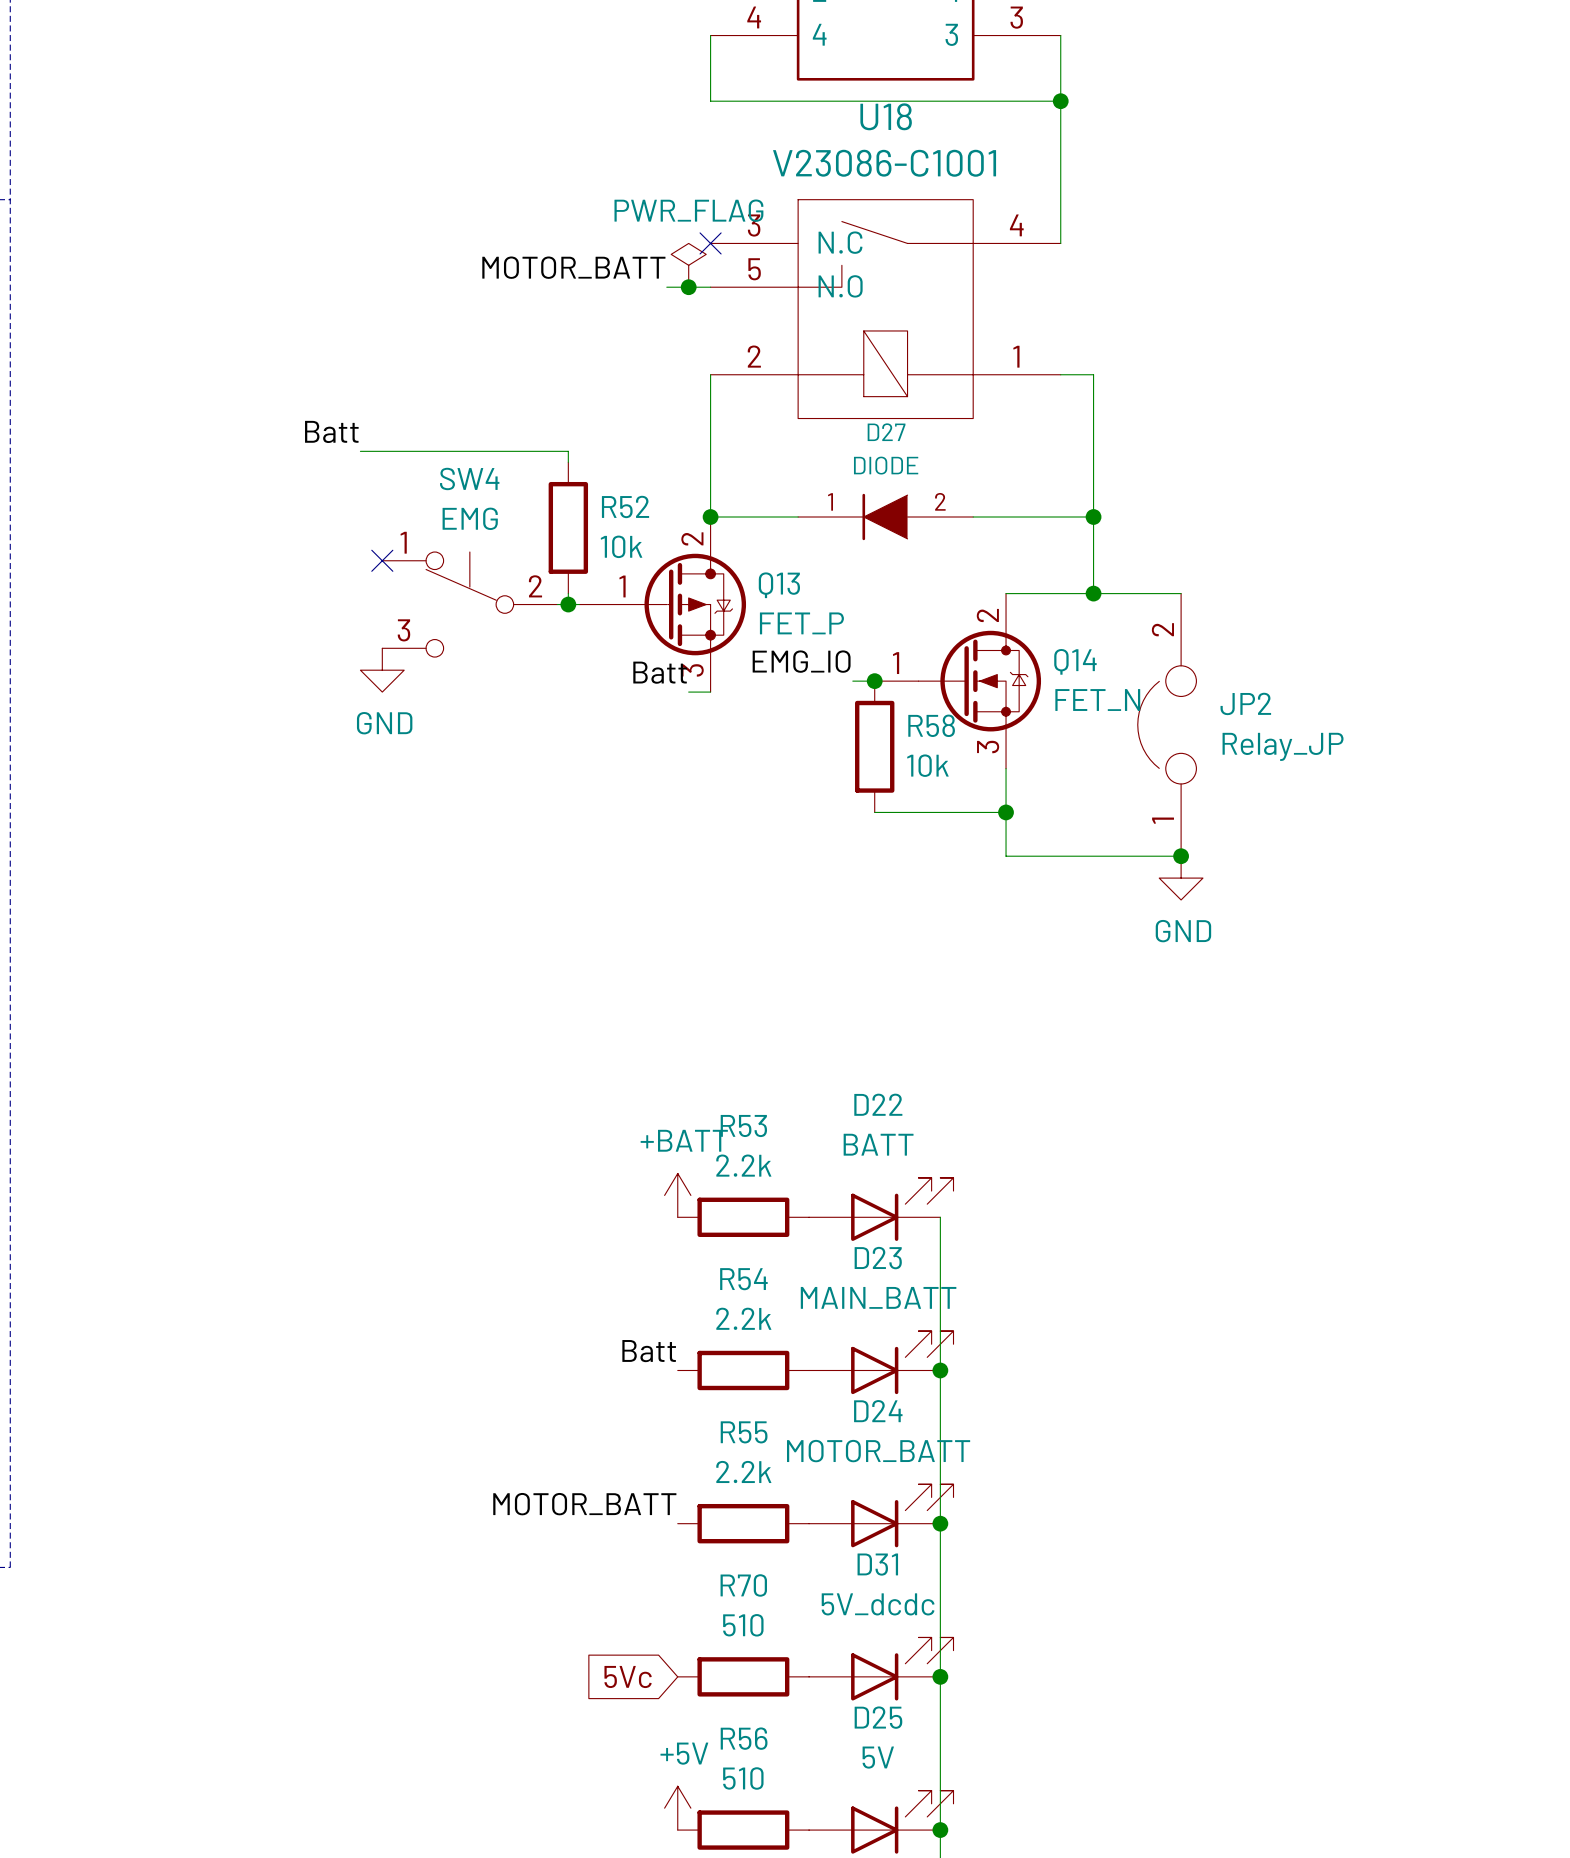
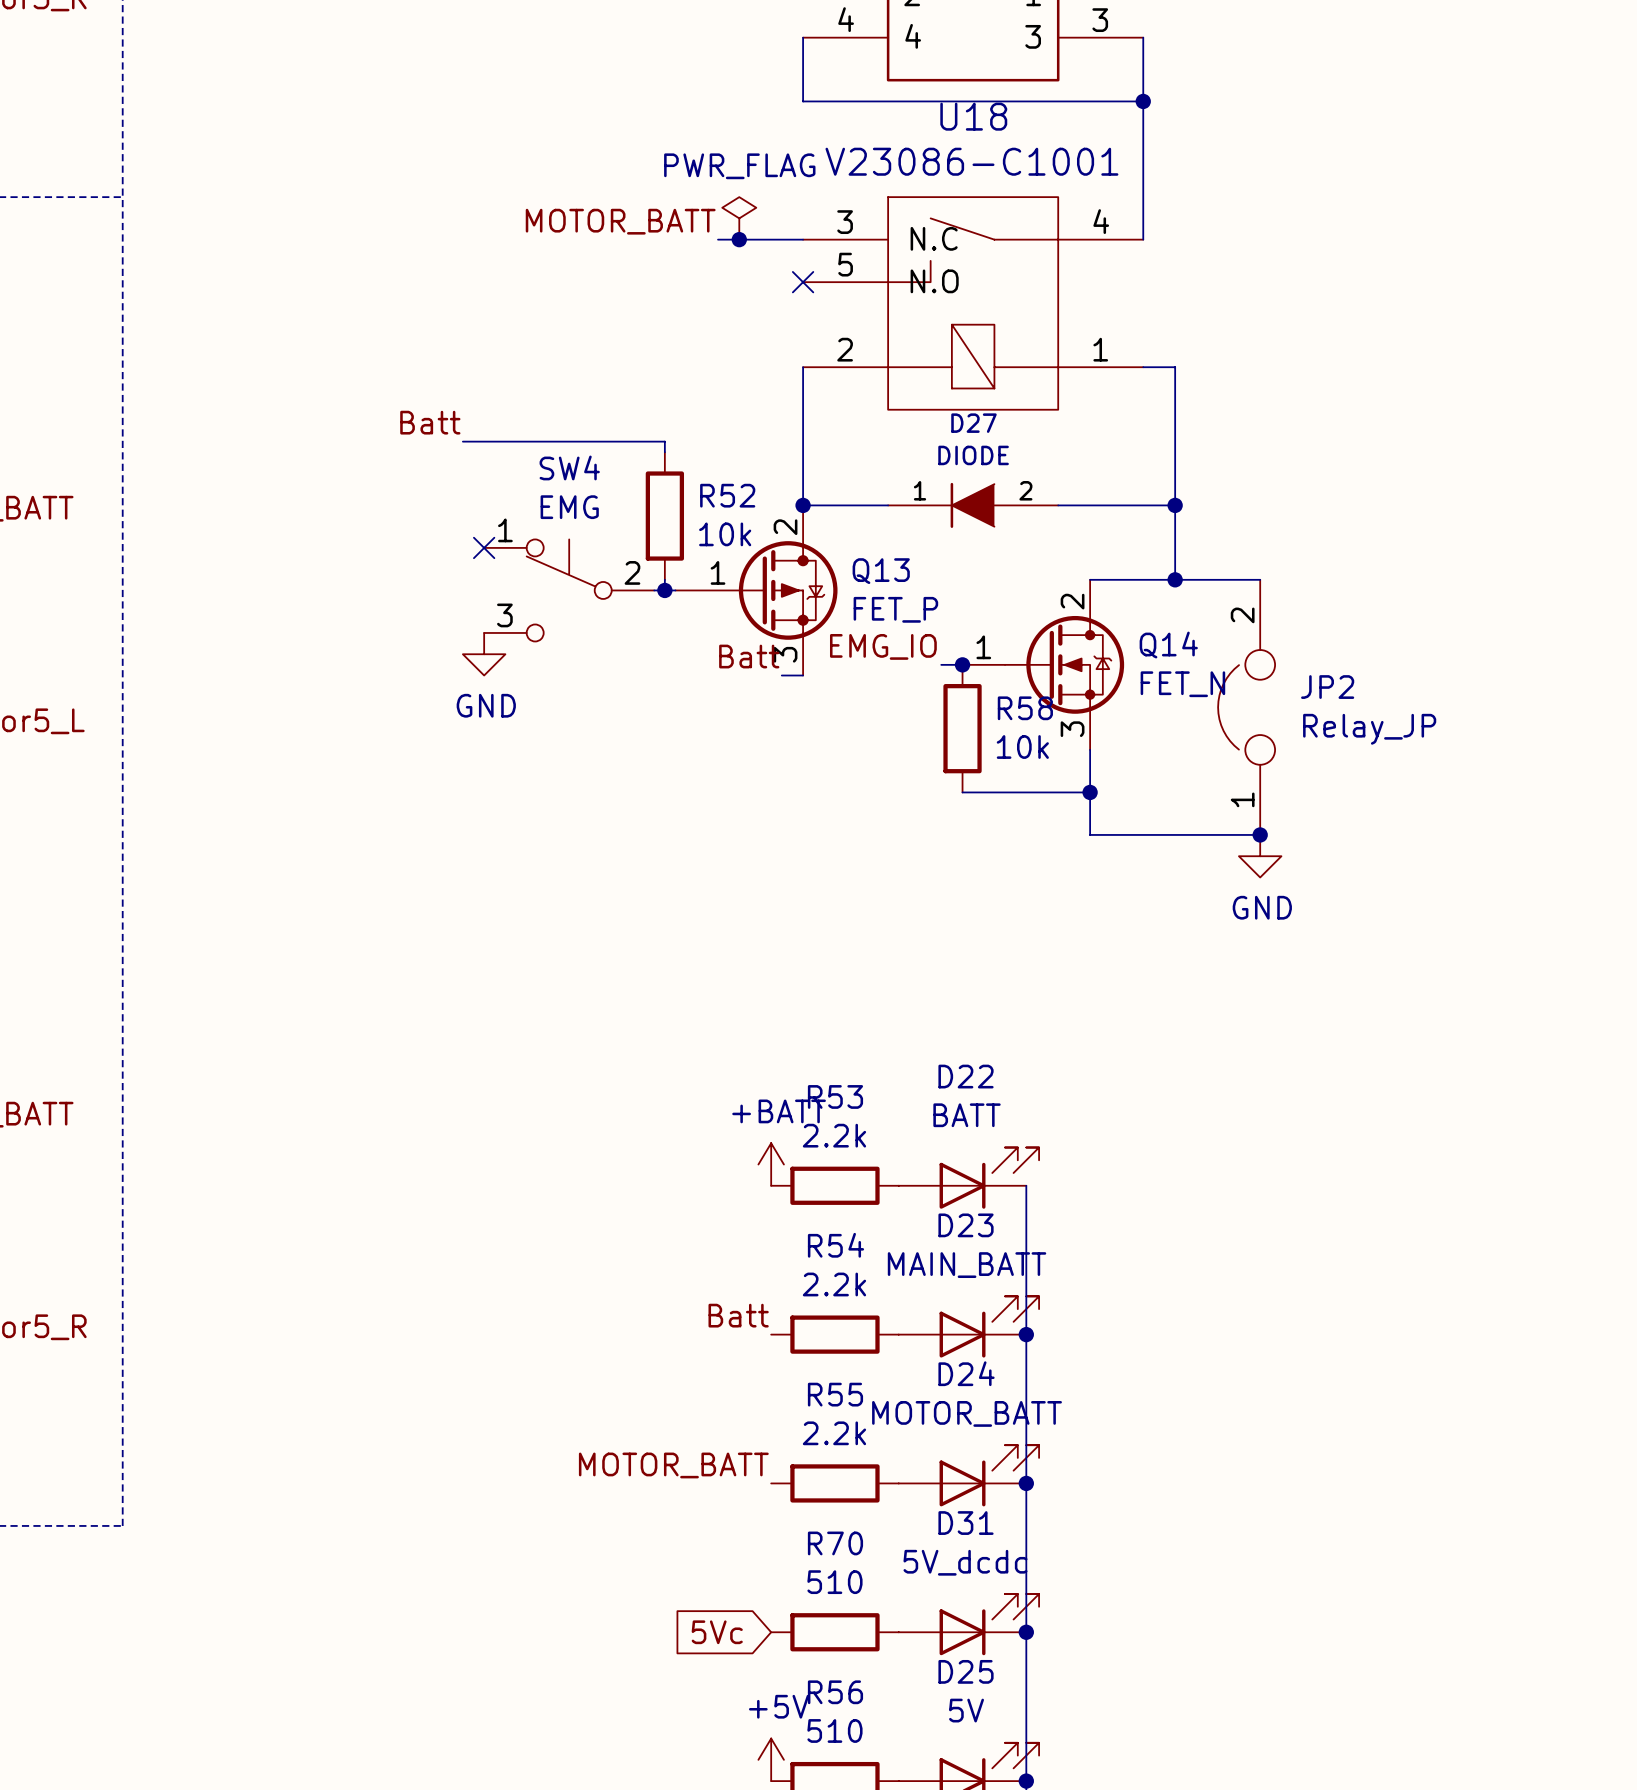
wire: none -> (718, 239) (803, 239)
no-connect mark position: (710, 243) -> (803, 282)
power symbol position: PWR_FLAG (688, 265) -> PWR_FLAG (739, 218)
label position: MOTOR_BATT (573, 267) -> MOTOR_BATT (620, 221)
wire: (666, 287) (710, 287) -> none
junction position: (688, 287) -> (739, 239)

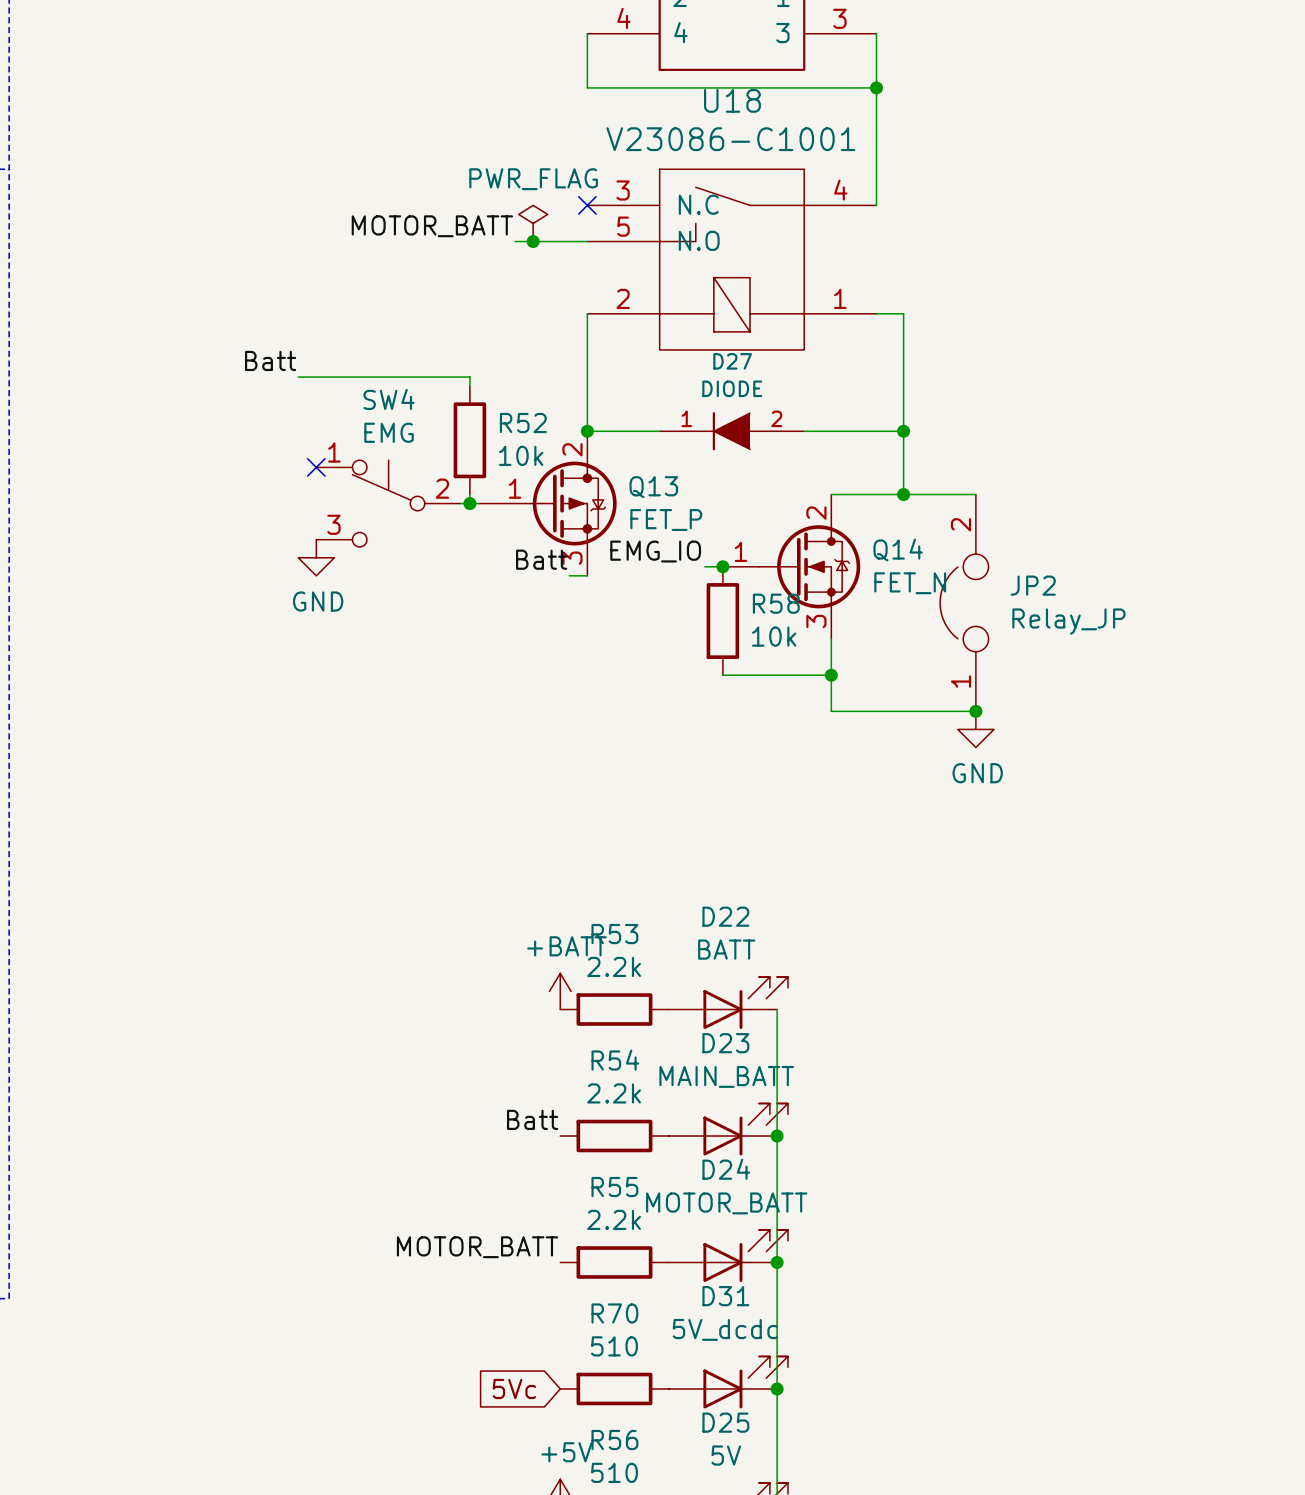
power symbol position: PWR_FLAG (739, 218) -> PWR_FLAG (533, 223)
label position: MOTOR_BATT (620, 221) -> MOTOR_BATT (432, 226)
wire: (718, 239) (803, 239) -> (515, 241) (587, 241)
junction position: (739, 239) -> (533, 241)
no-connect mark position: (803, 282) -> (587, 205)

